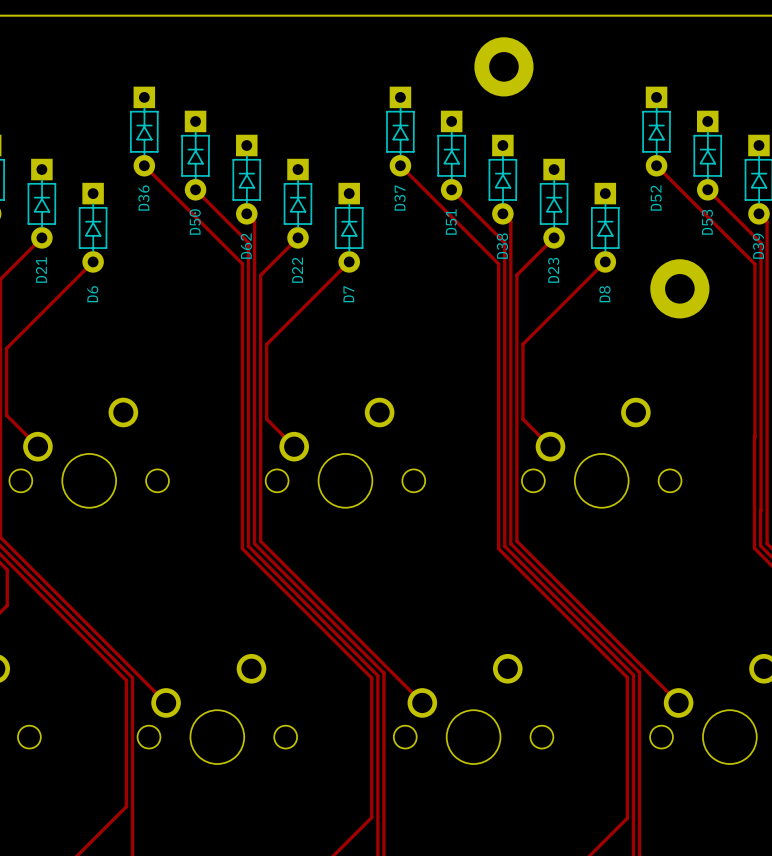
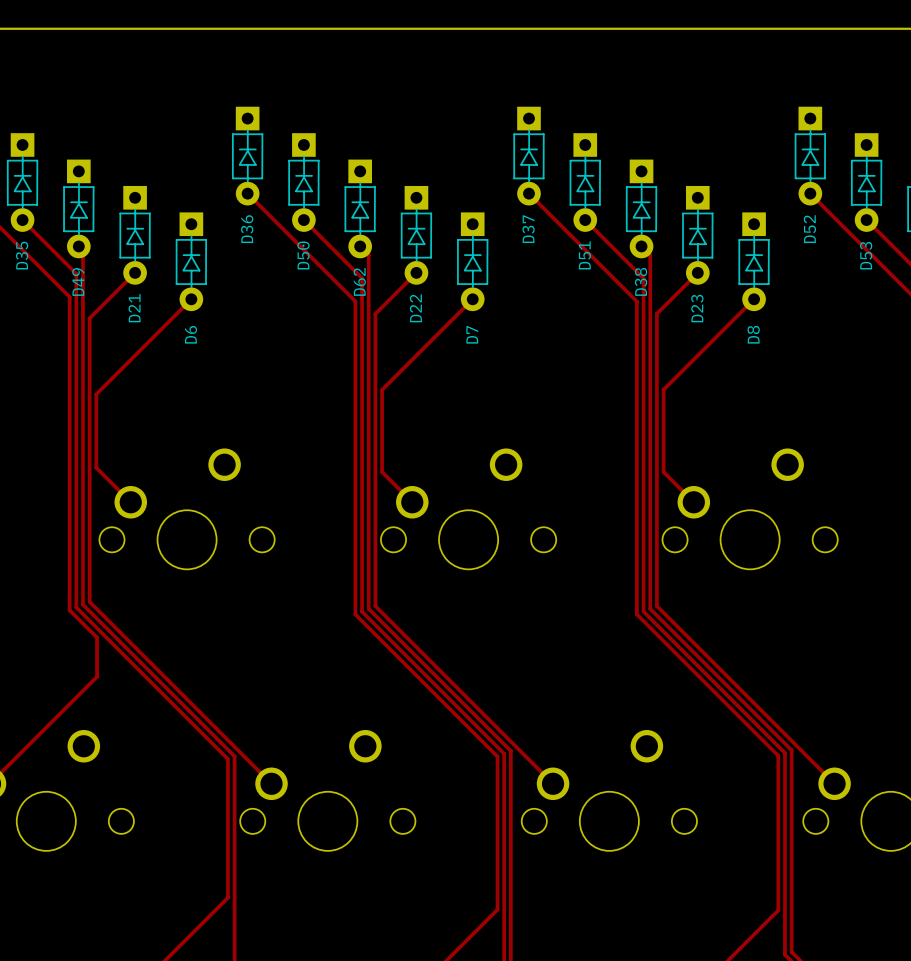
part: (503, 66) -> none
part: (679, 288) -> none

